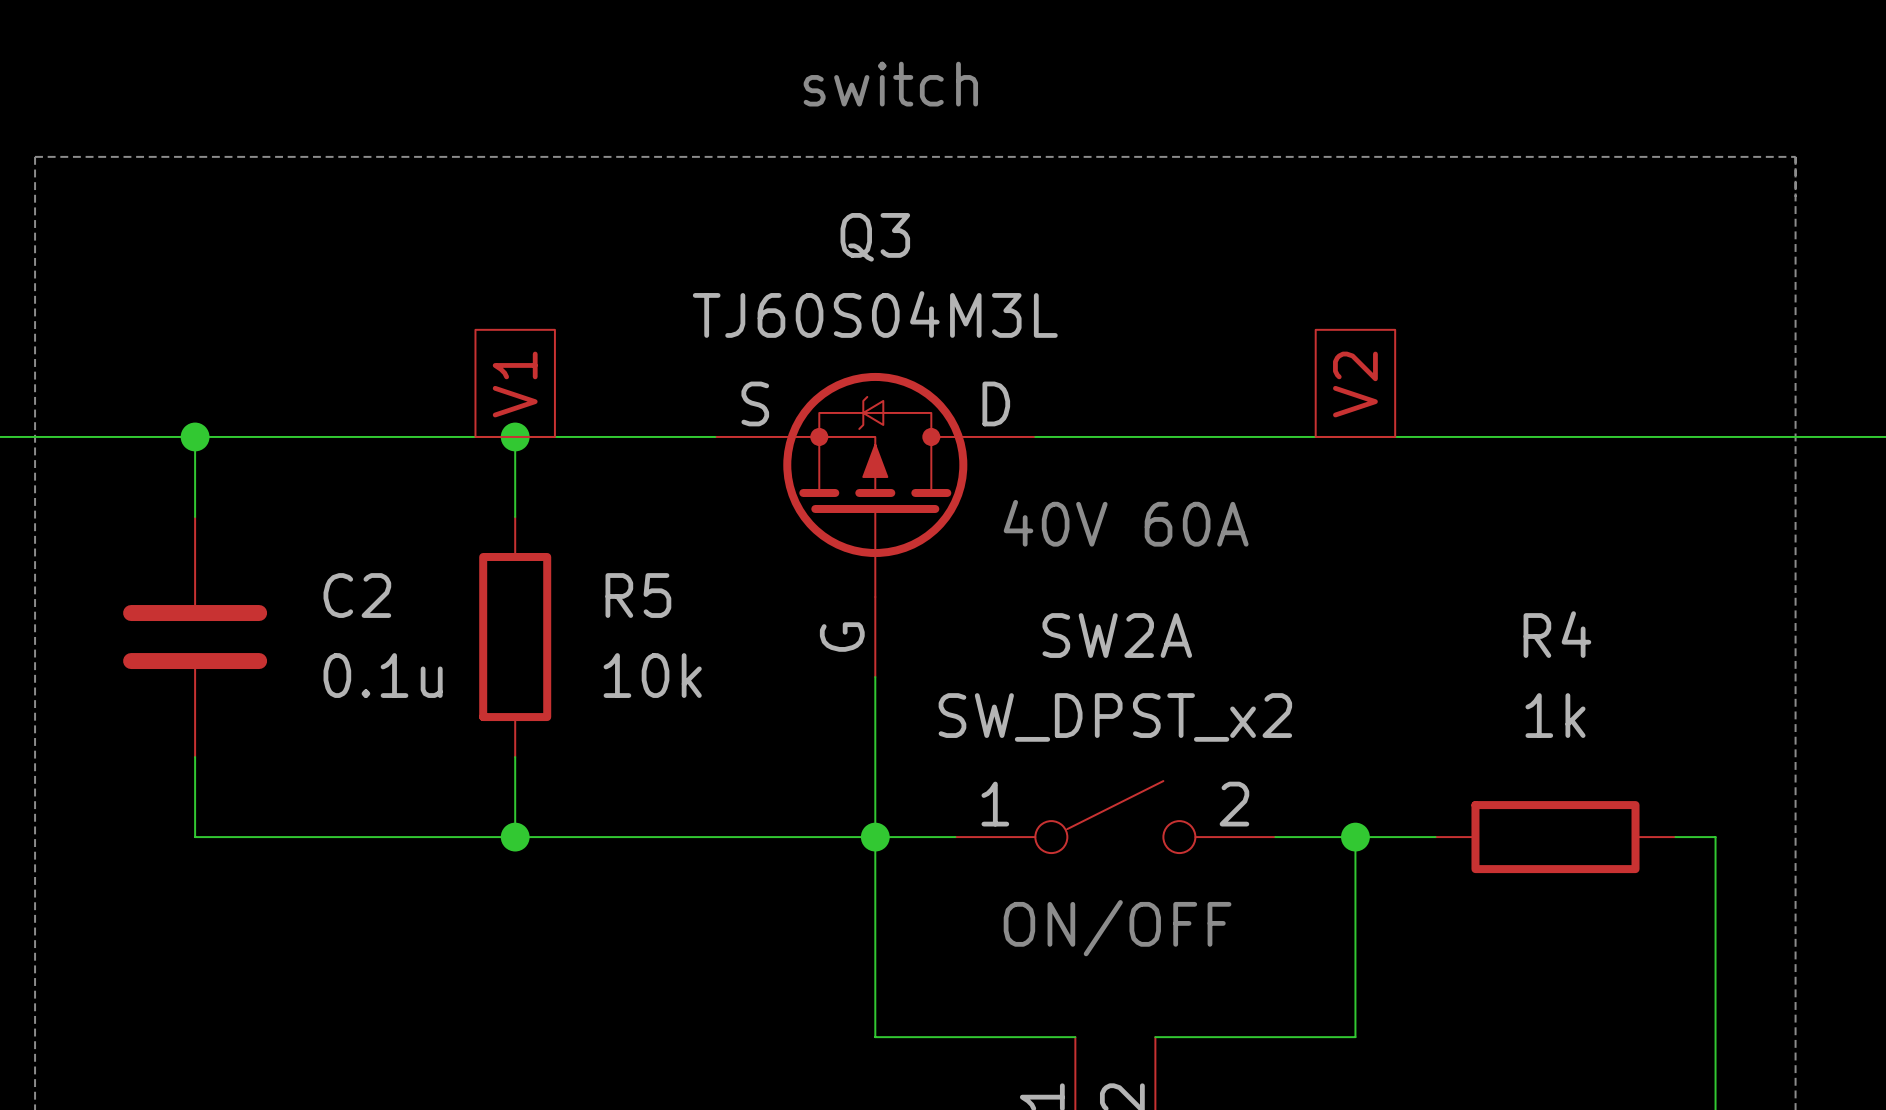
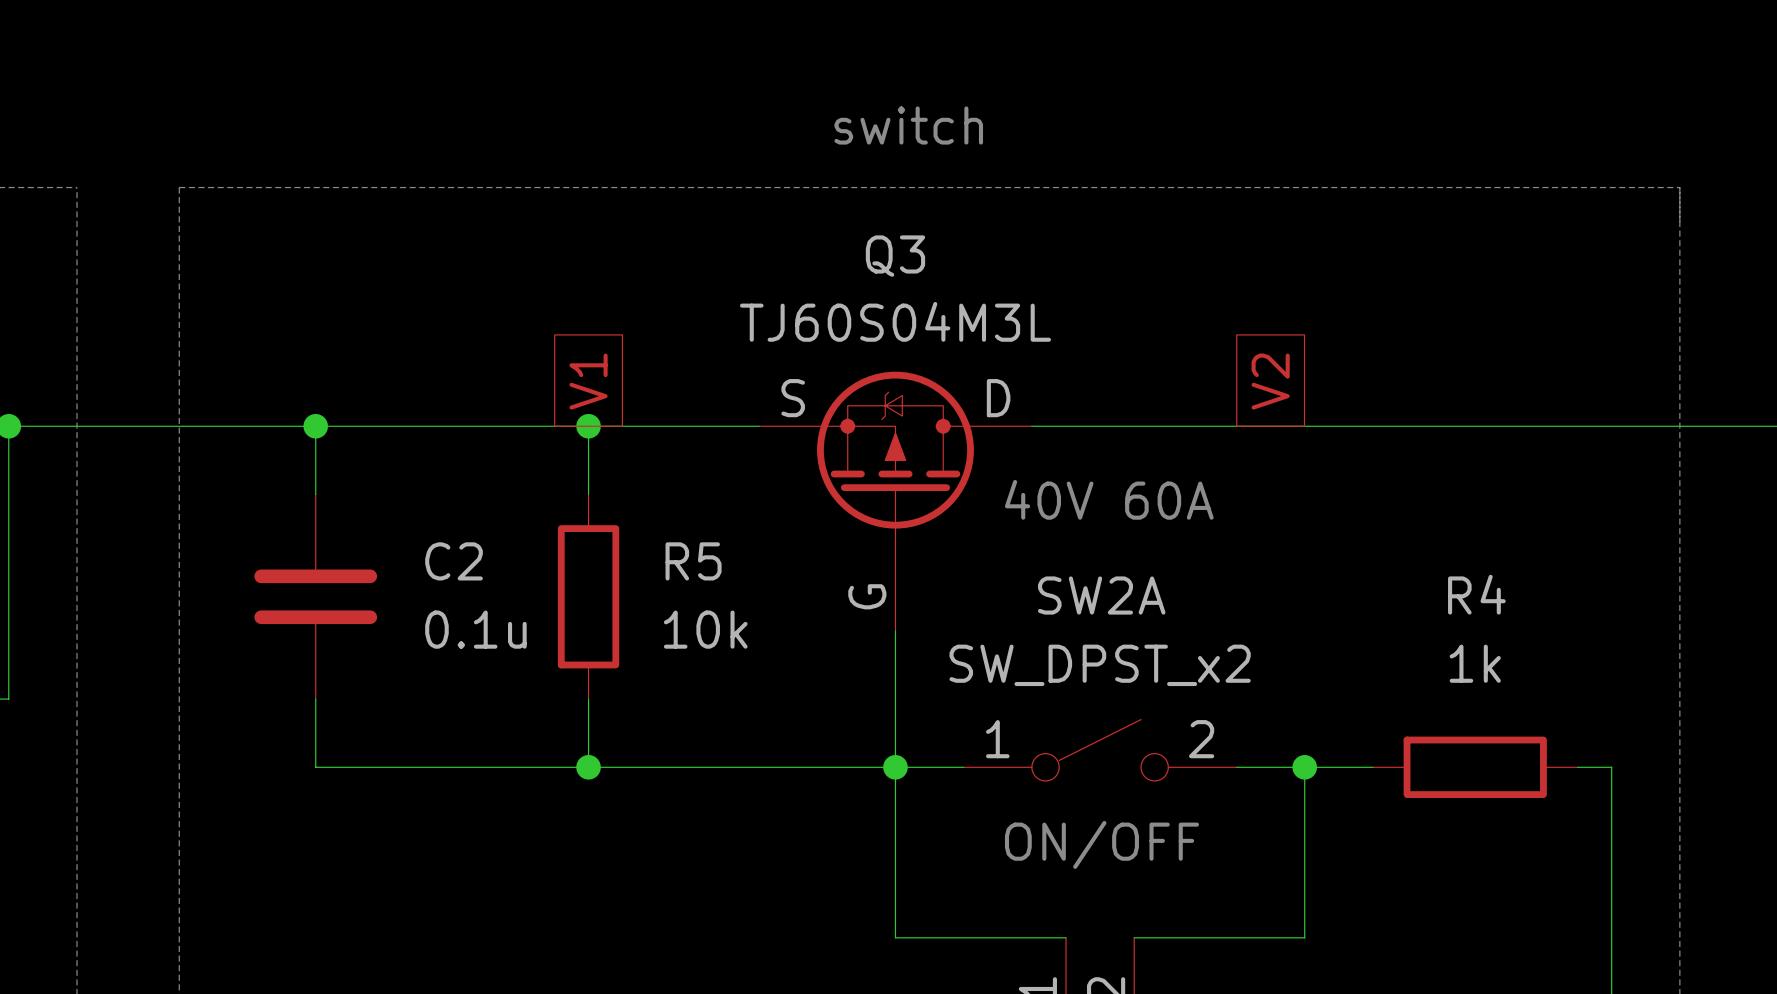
global label position: V2 (1355, 384) -> V2 (1270, 381)

